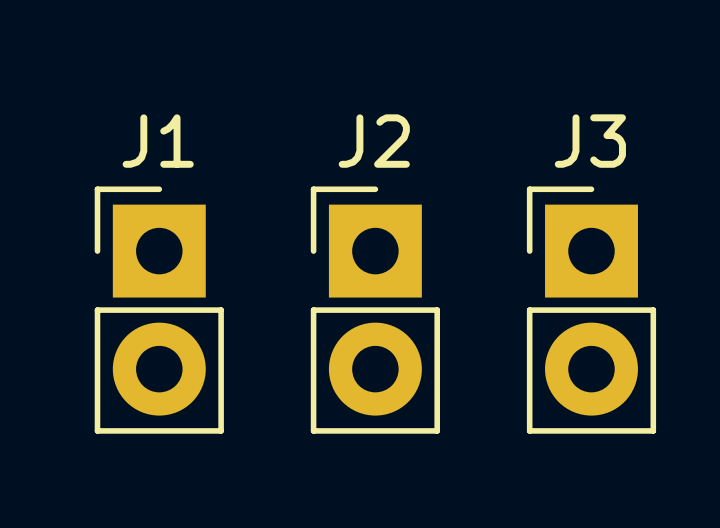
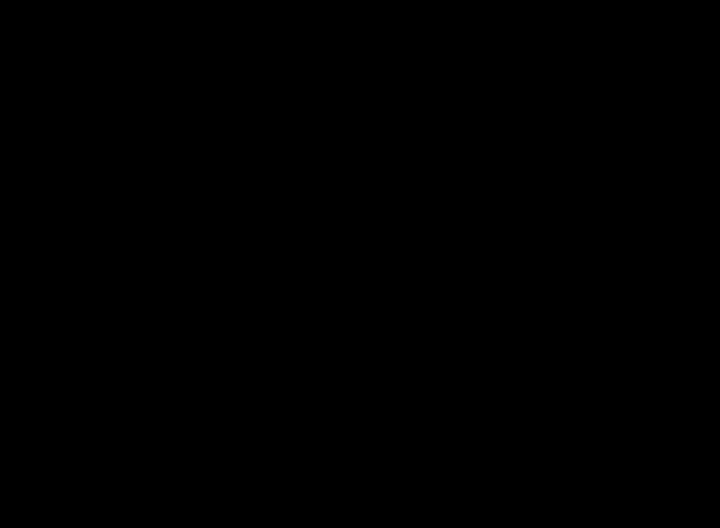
J1: (159, 310) -> none
J2: (375, 310) -> none
J3: (591, 310) -> none

